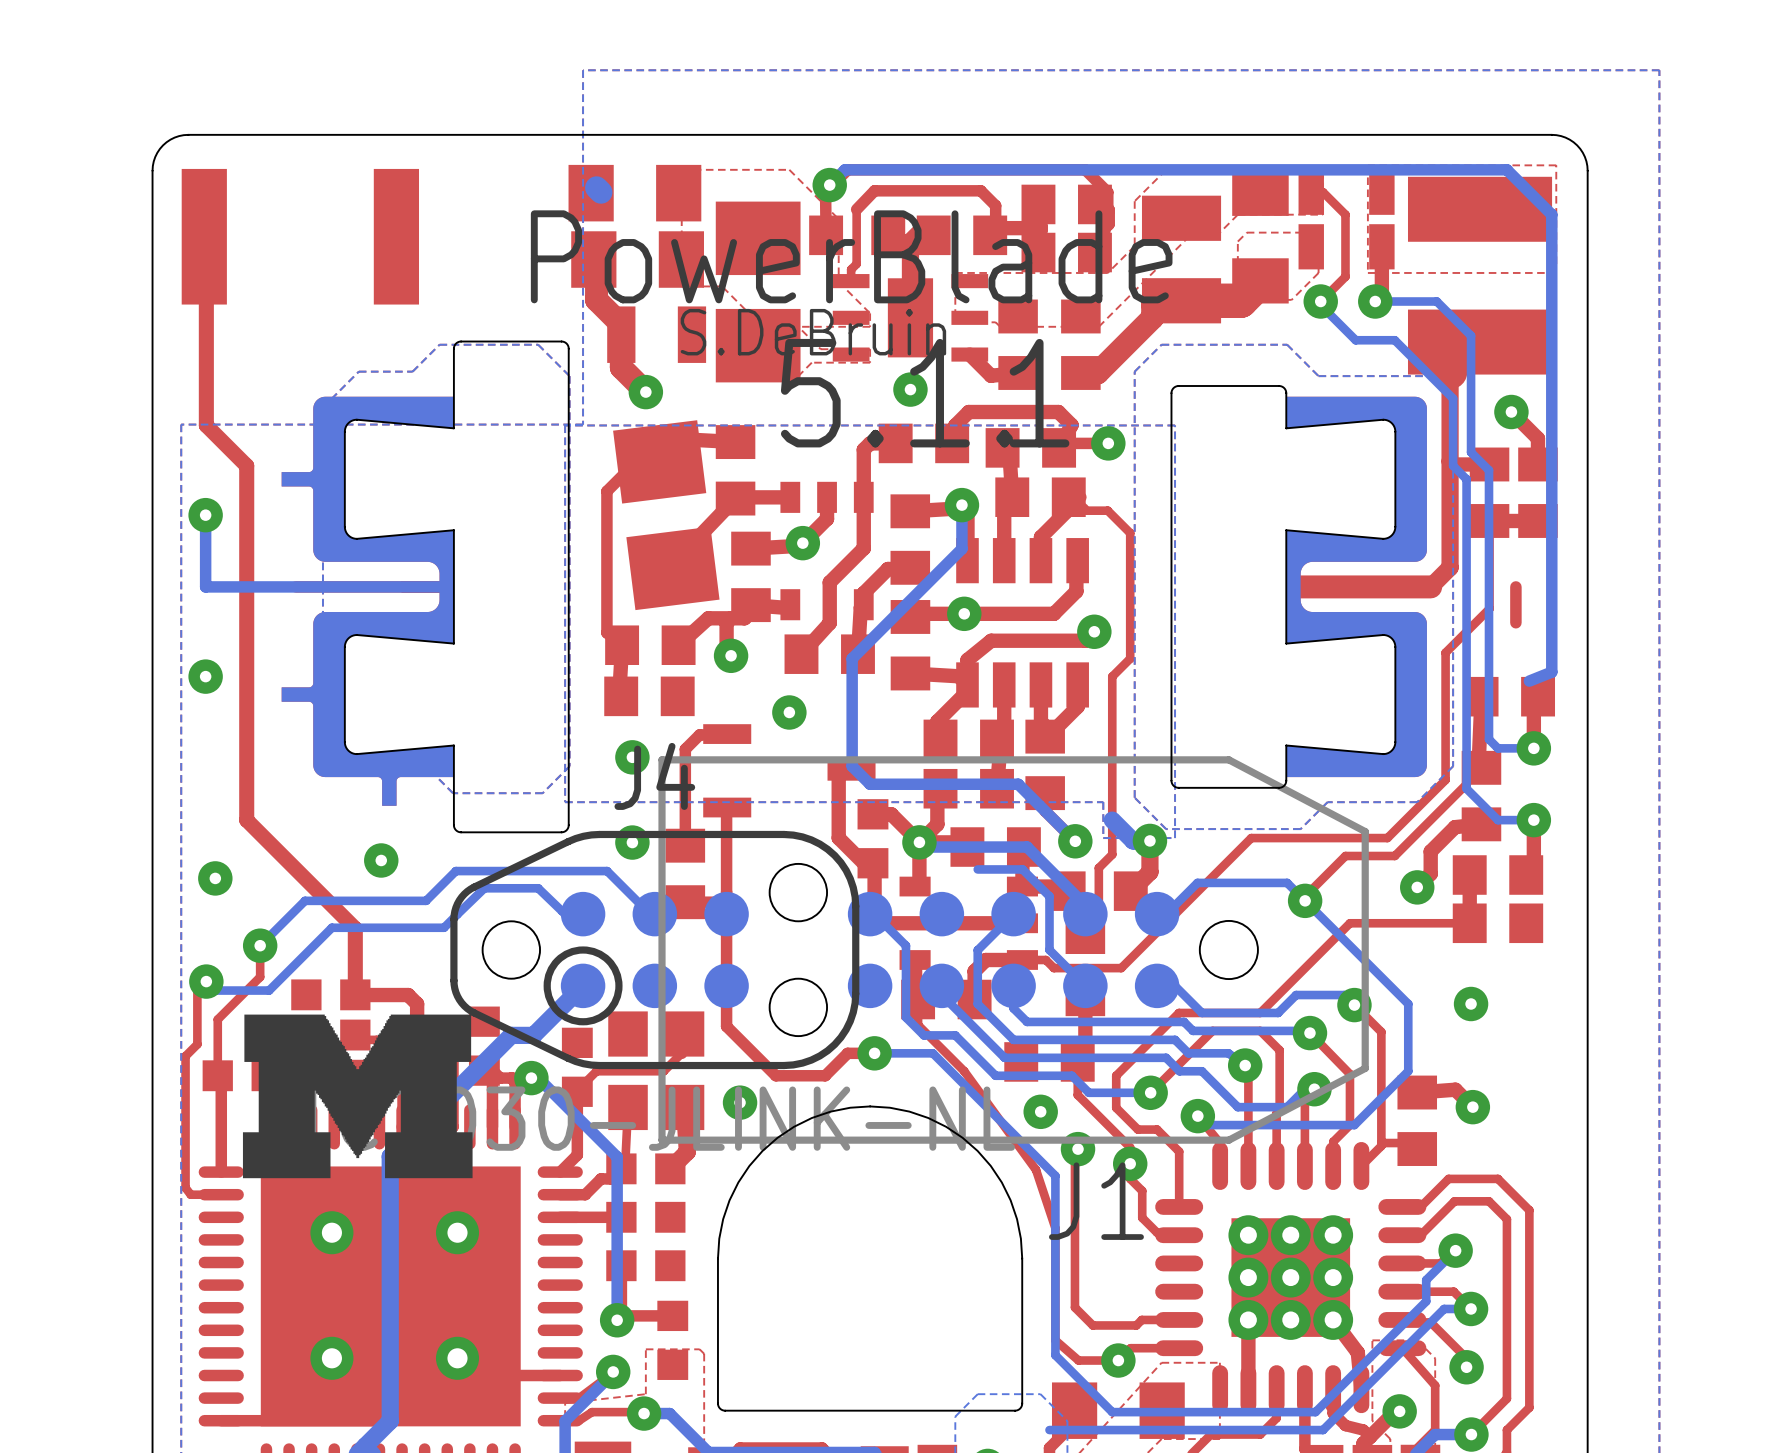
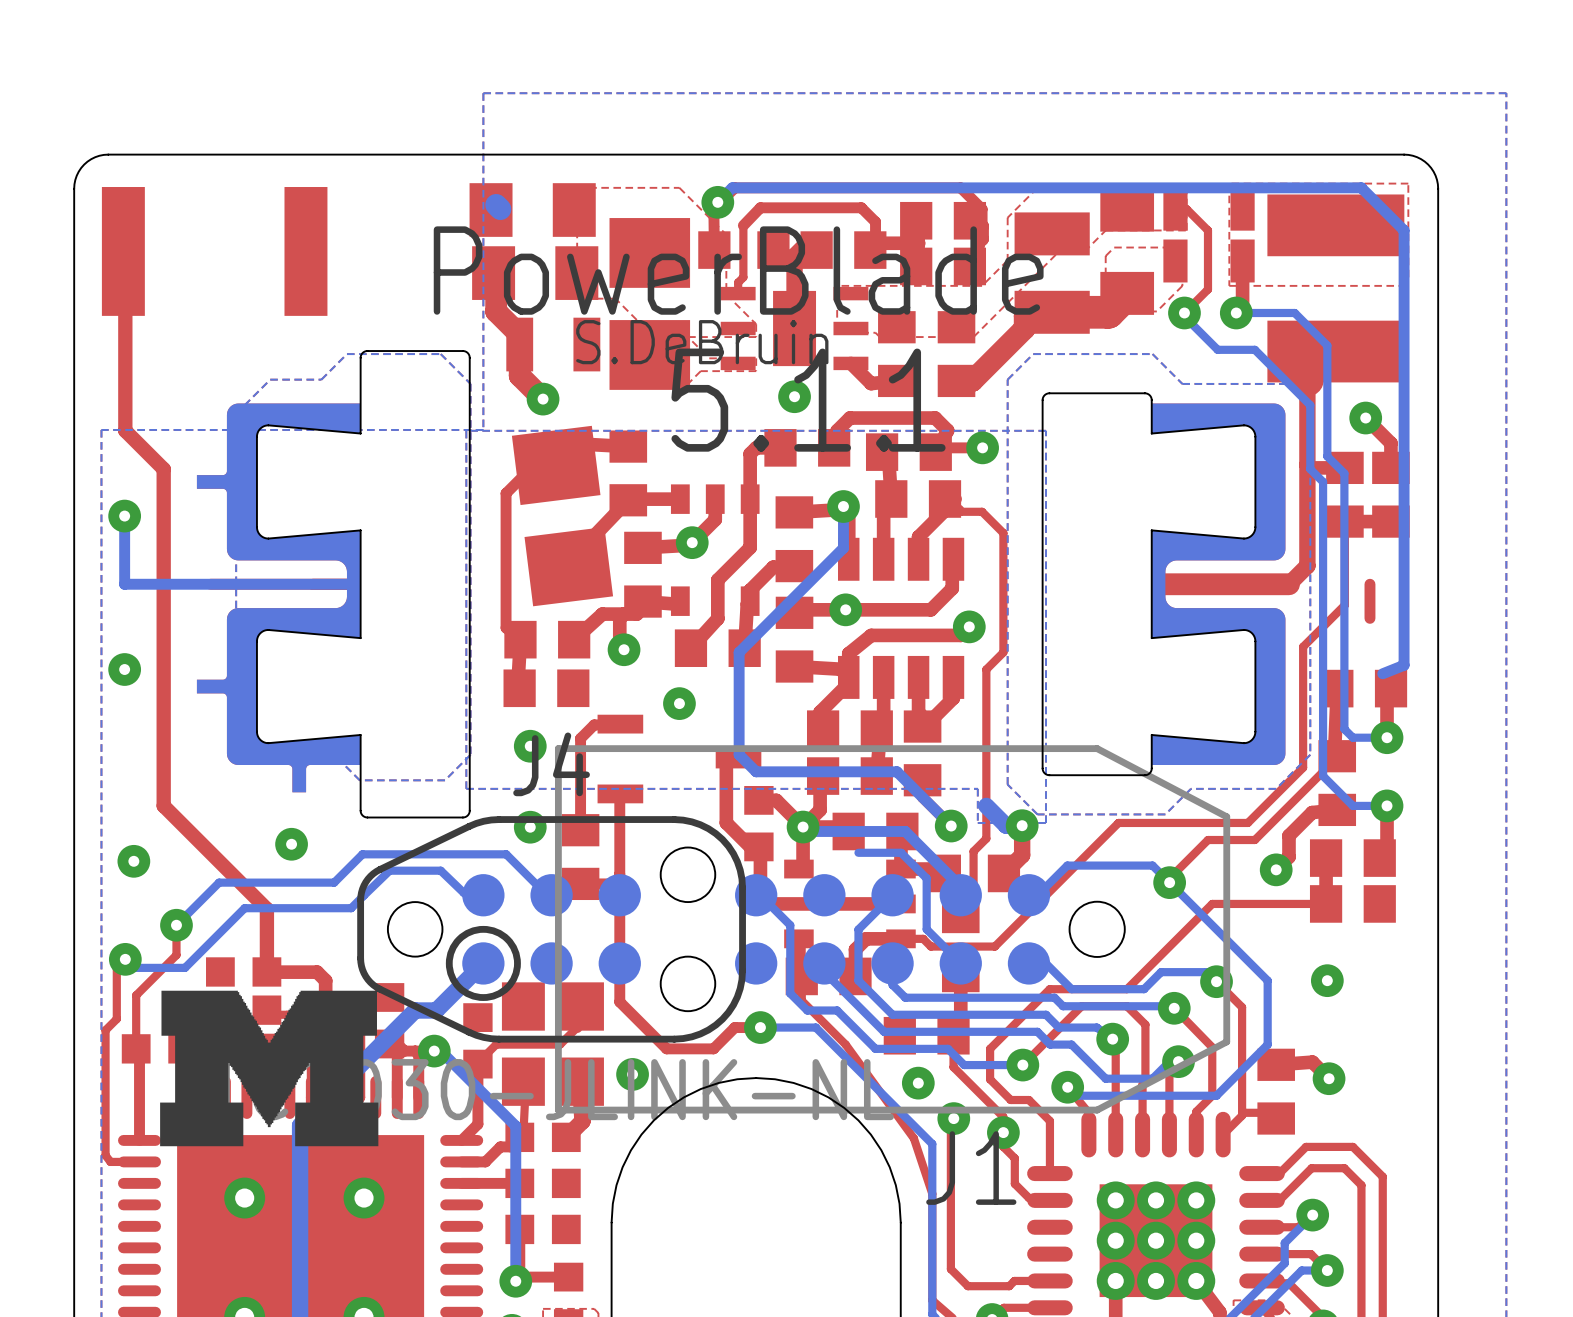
part footprint: [608, 1011, 705, 1131] -> [501, 982, 604, 1106]

